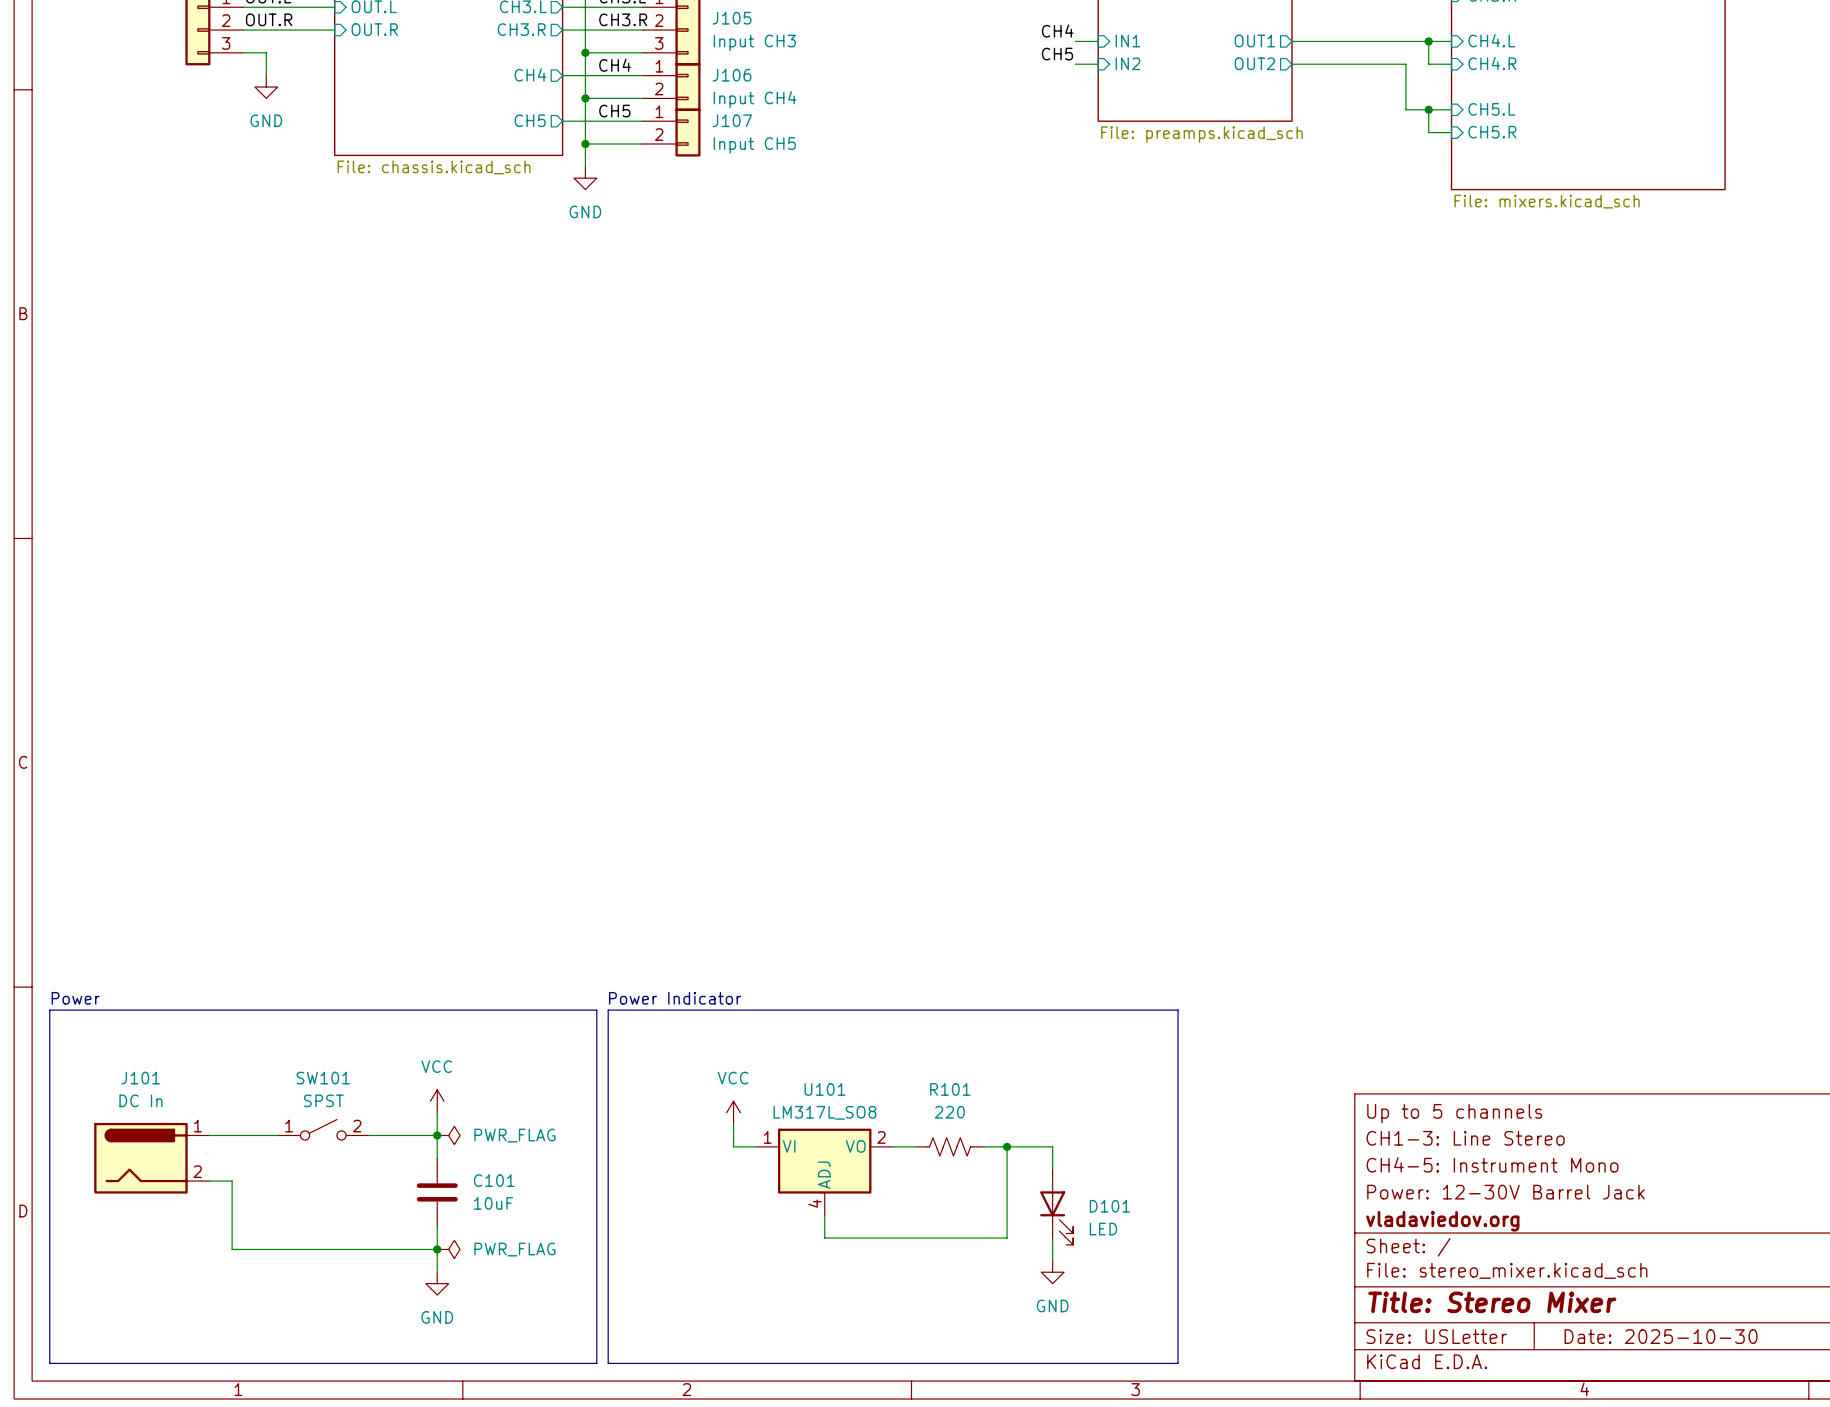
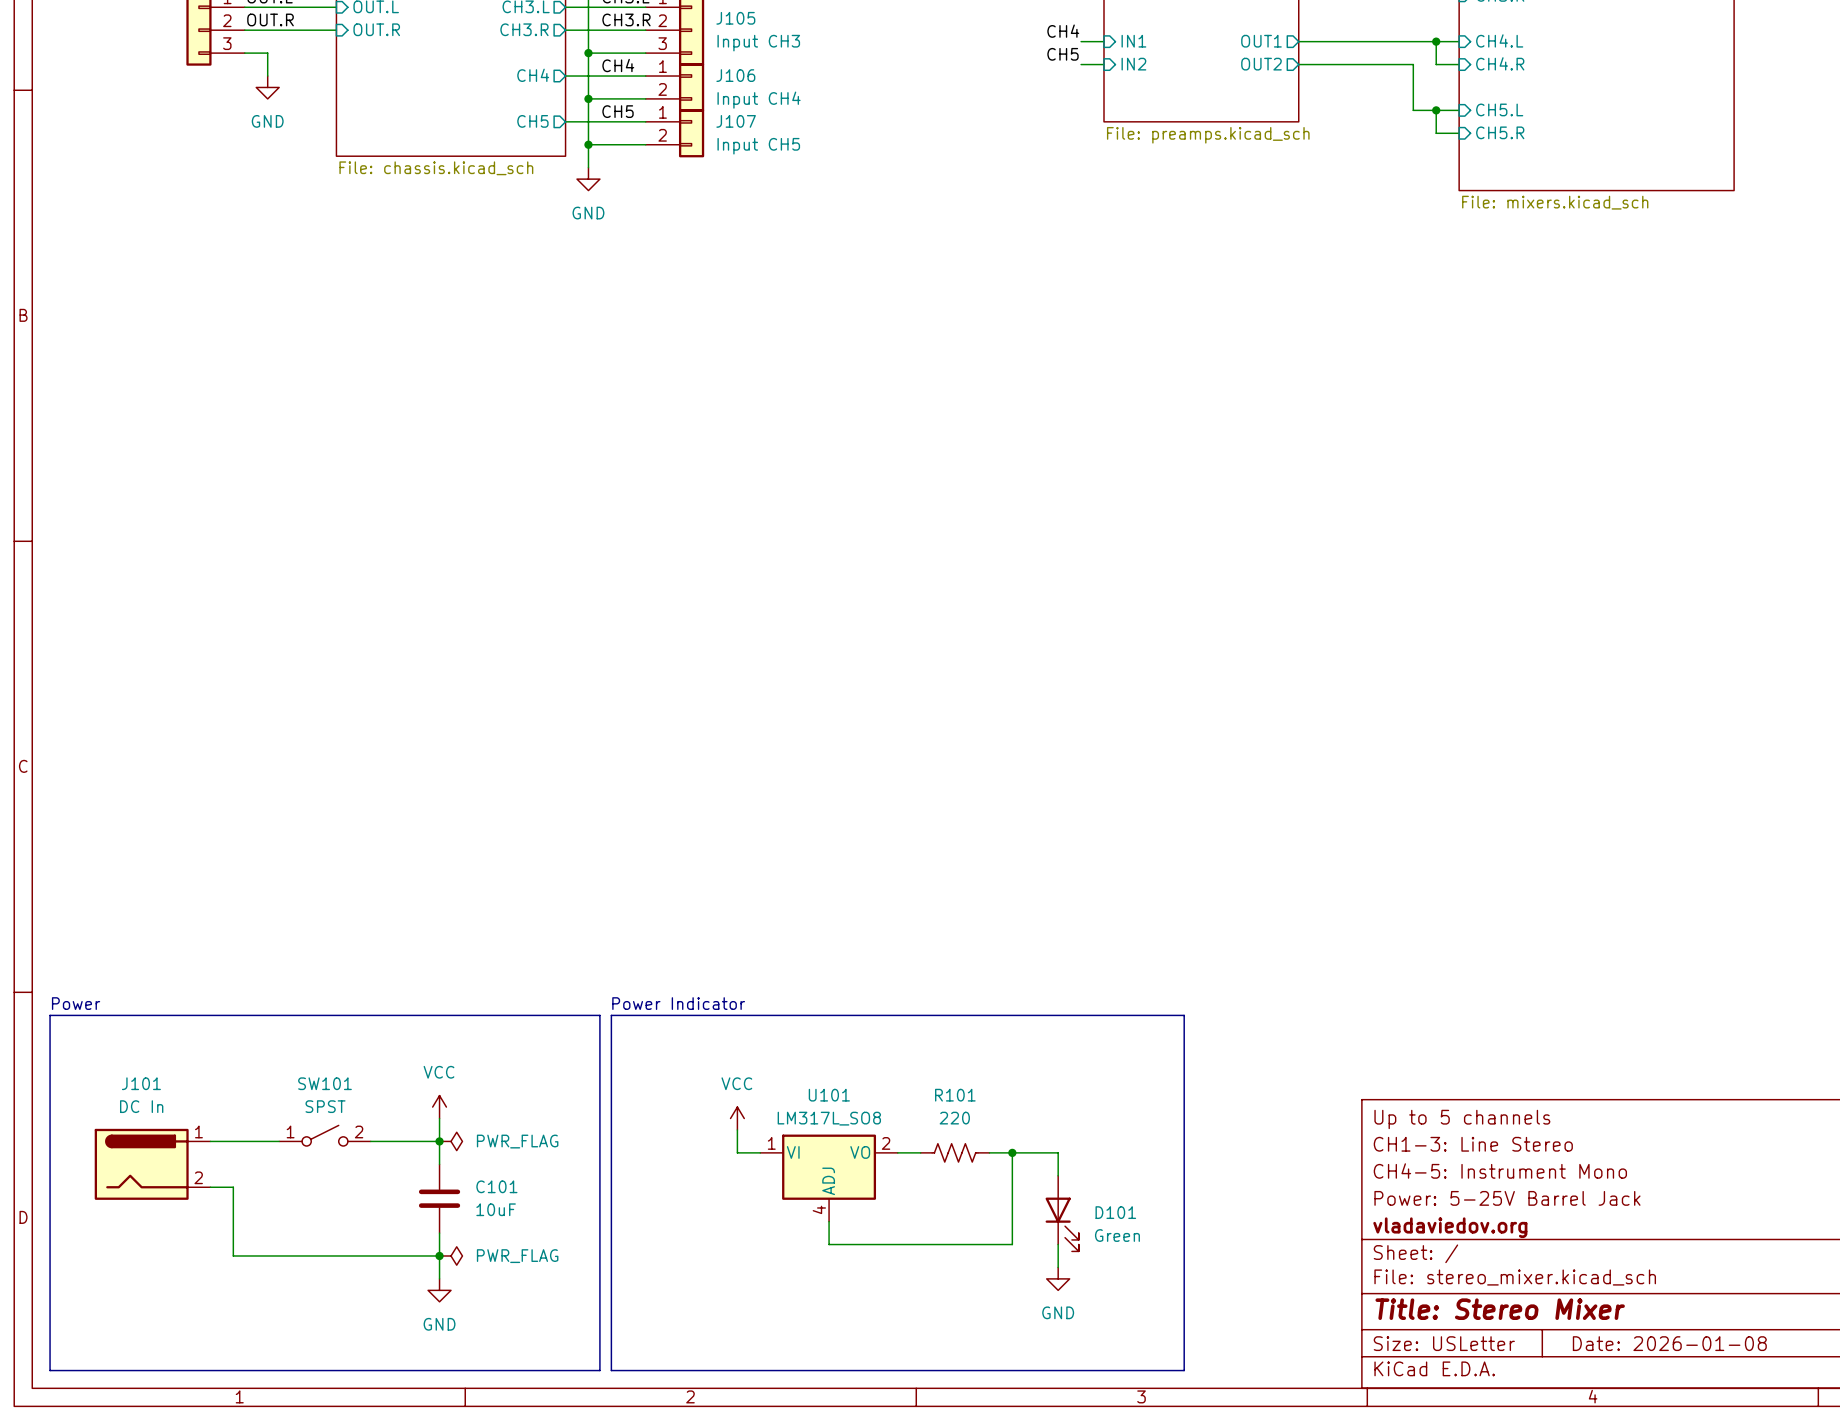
title block: Power: 12-30V Barrel Jack (1505, 1192) -> Power: 5-25V Barrel Jack (1507, 1198)
D101 value: LED (1103, 1229) -> Green (1117, 1235)
title block: Date: 2025-10-30 (1661, 1336) -> Date: 2026-01-08 (1669, 1343)

